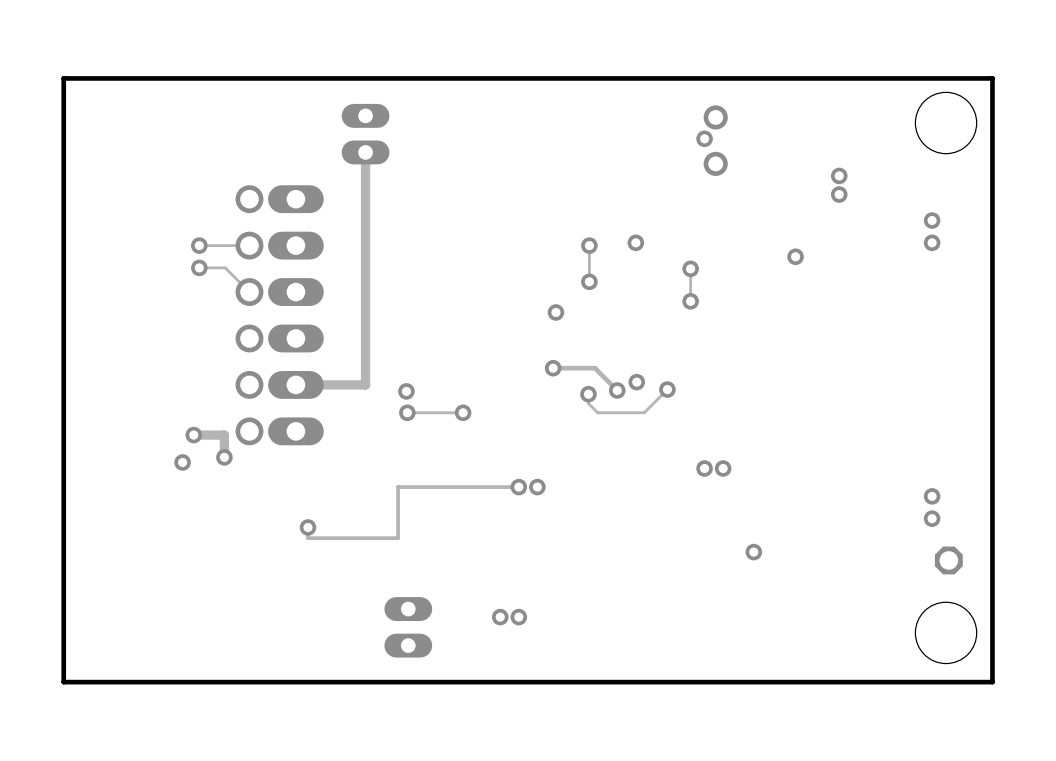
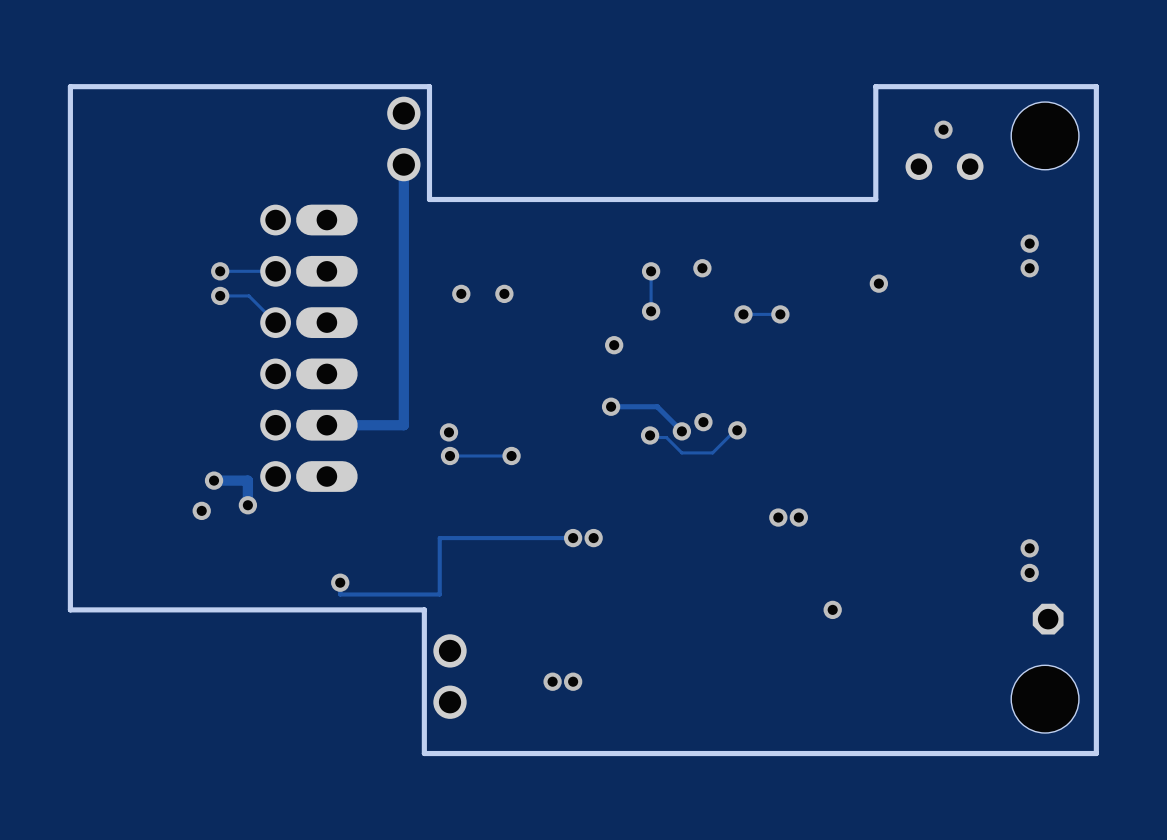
board edge: (792, 78) (388, 78) -> (875, 86) (875, 199) (429, 199) (429, 86)
part footprint: [341, 103, 390, 165] -> [387, 96, 421, 182]
via: none -> (943, 129)
via: (704, 138) -> none
part rotation: 0° (715, 140) -> 90° clockwise (944, 166)
part position: (715, 140) -> (944, 166)
via: (839, 175) -> none
via: (839, 194) -> none
via: none -> (461, 293)
via: none -> (504, 293)
track: (690, 268) (690, 301) -> none
via: (690, 268) -> none
via: none -> (743, 314)
track: none -> (780, 314) (743, 314)
via: none -> (780, 314)
via: (690, 301) -> none
track: (667, 389) (644, 412) (597, 412) (588, 403) (588, 394) -> none
track: none -> (734, 431) (712, 452) (681, 452) (666, 437) (644, 437)
board edge: (63, 552) (63, 682) (384, 682) -> (70, 609) (424, 609) (424, 753)
part footprint: [384, 597, 433, 658] -> [433, 634, 467, 719]

